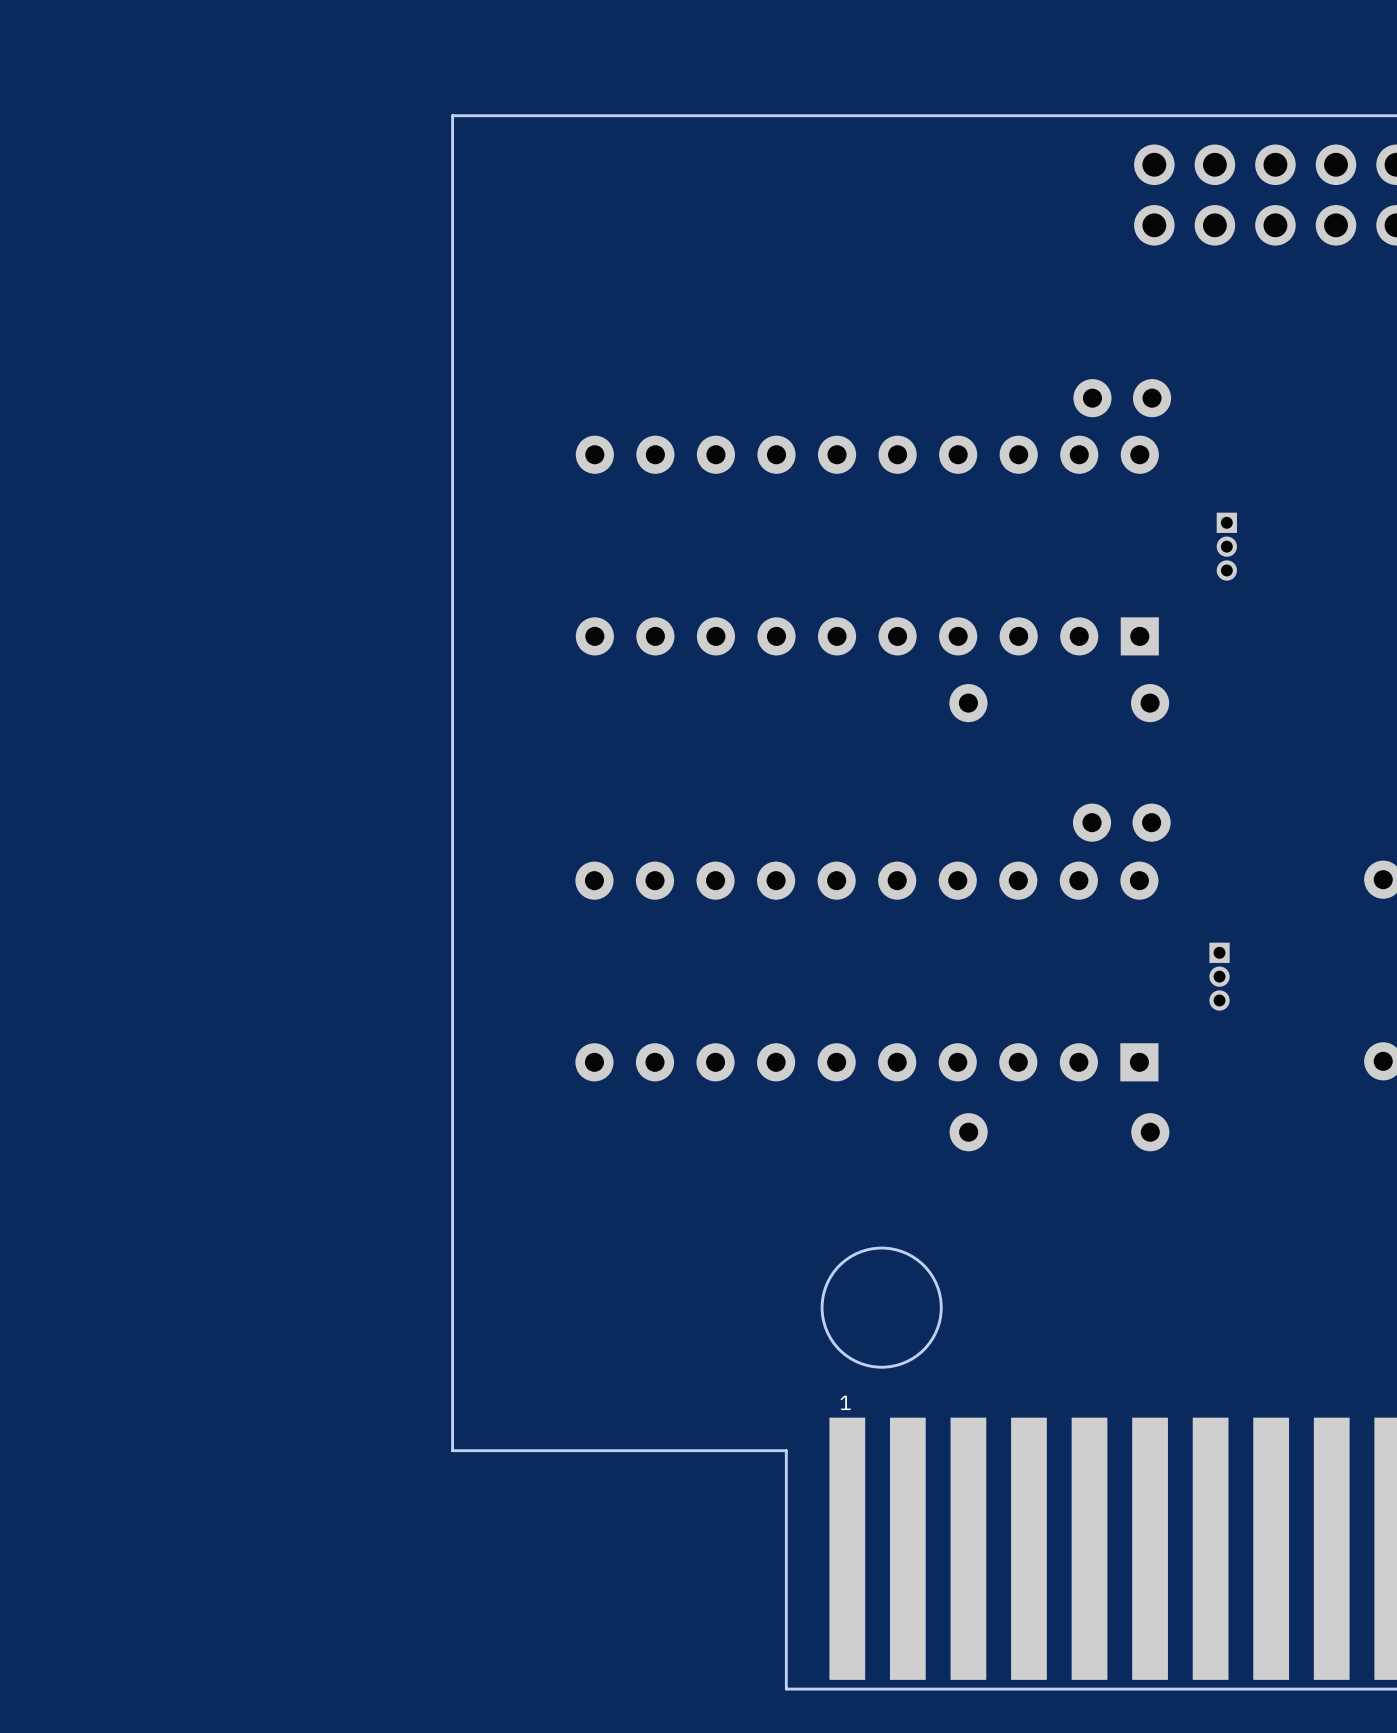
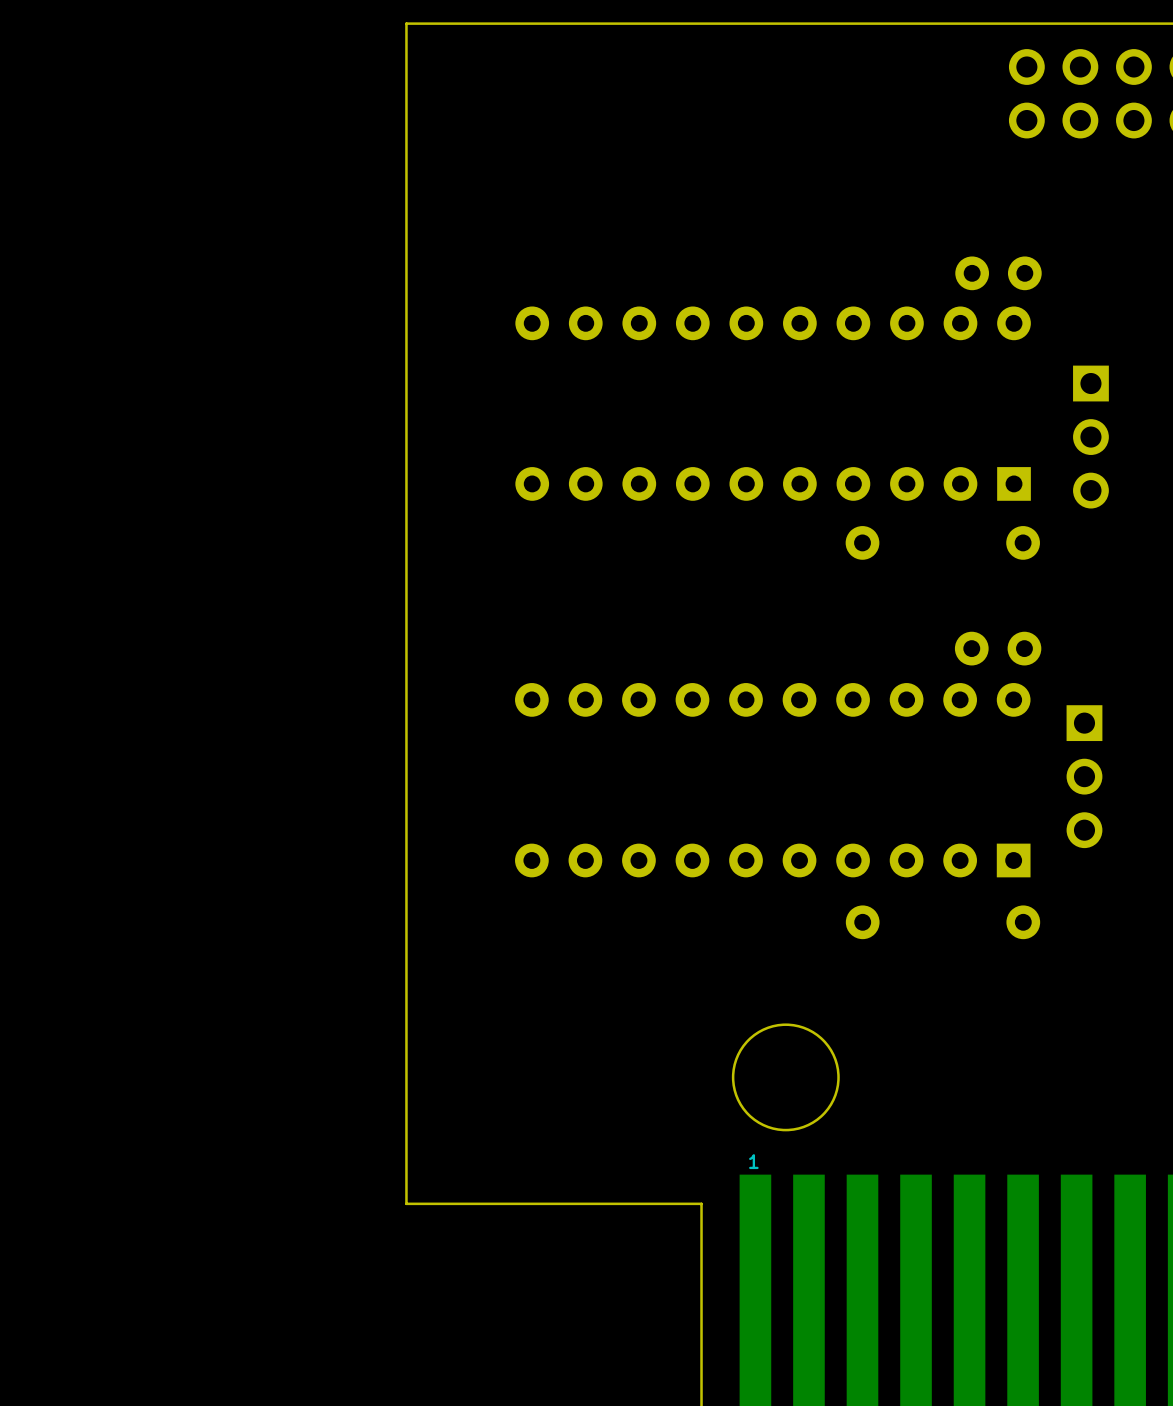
part: (1226, 546) -> none
part: none -> (1090, 437)
part footprint: [1209, 942, 1230, 1011] -> [1066, 705, 1103, 849]

